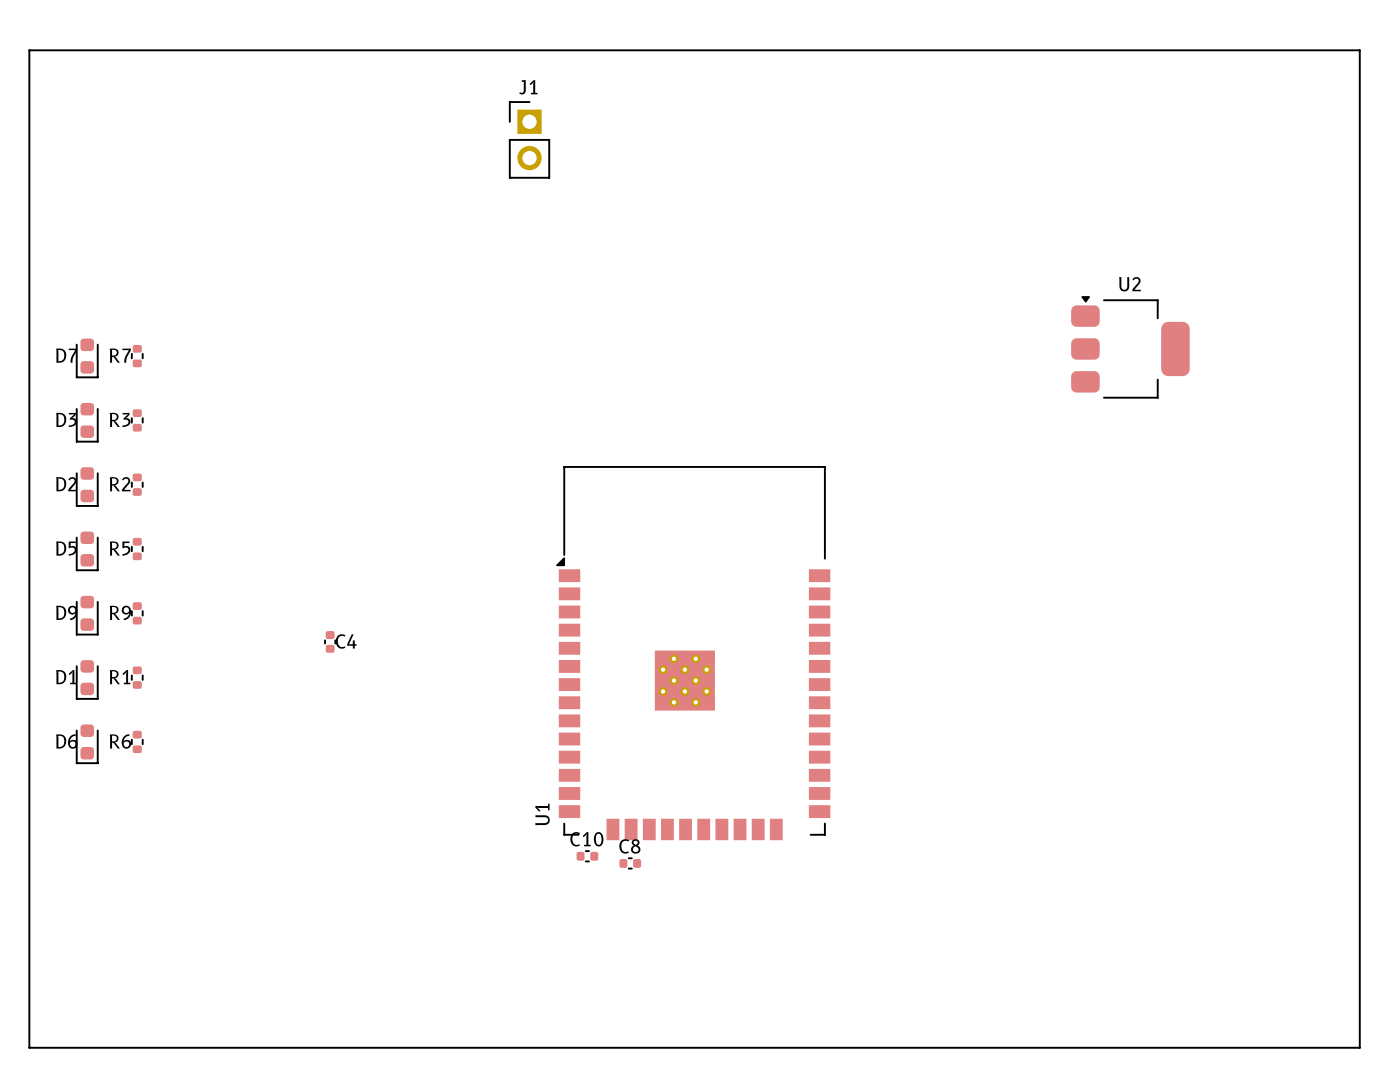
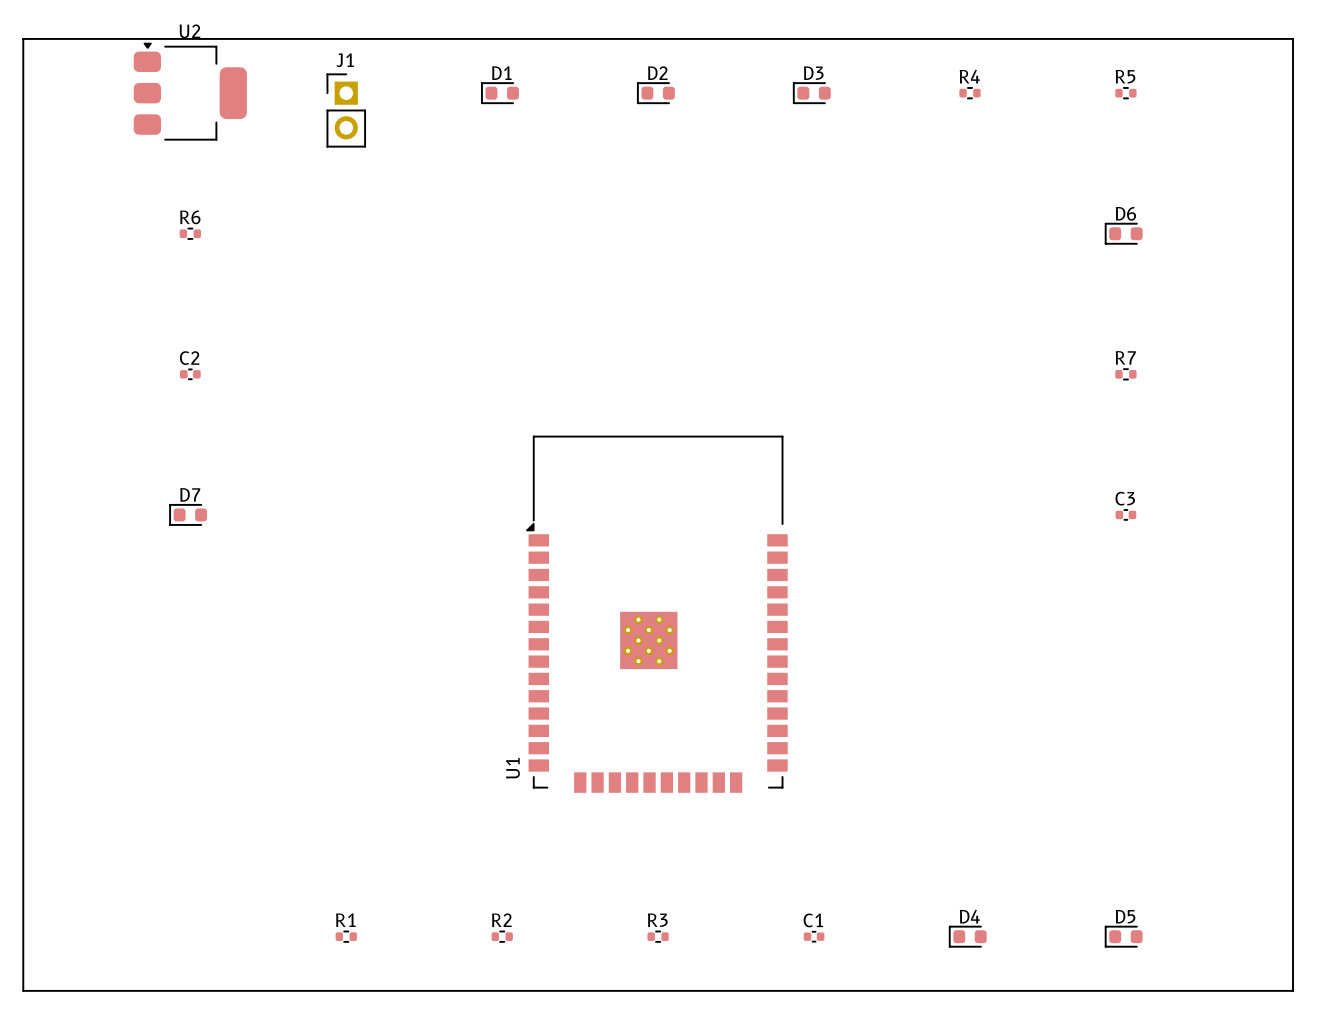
R4: none -> (969, 93)
J1 position: (529, 139) -> (346, 110)
U2 position: (1130, 347) -> (190, 91)
R7 rotation: 0° (137, 356) -> 90° clockwise (1125, 374)
R7 position: (137, 356) -> (1125, 374)
D7 rotation: 0° (87, 358) -> 90° clockwise (188, 514)
D7 position: (87, 358) -> (188, 514)
C2: none -> (190, 374)
R3 rotation: 0° (137, 420) -> 90° clockwise (658, 936)
R3 position: (137, 420) -> (658, 936)
D3 rotation: 0° (87, 422) -> 90° clockwise (811, 93)
D3 position: (87, 422) -> (811, 93)
R2 rotation: 0° (137, 484) -> 90° clockwise (502, 936)
R2 position: (137, 484) -> (502, 936)
D2 rotation: 0° (87, 487) -> 90° clockwise (655, 93)
D2 position: (87, 487) -> (655, 93)
R5 rotation: 0° (137, 549) -> 90° clockwise (1125, 93)
R5 position: (137, 549) -> (1125, 93)
C3: none -> (1125, 514)
D5 rotation: 0° (87, 551) -> 90° clockwise (1123, 936)
D5 position: (87, 551) -> (1123, 936)
R9: (137, 613) -> none
D9: (87, 615) -> none
C4: (330, 641) -> none
R1 rotation: 0° (137, 677) -> 90° clockwise (346, 936)
R1 position: (137, 677) -> (346, 936)
D1 rotation: 0° (87, 679) -> 90° clockwise (500, 93)
D1 position: (87, 679) -> (500, 93)
R6 rotation: 0° (137, 741) -> 90° clockwise (190, 233)
R6 position: (137, 741) -> (190, 233)
D6 rotation: 0° (87, 744) -> 90° clockwise (1123, 233)
D6 position: (87, 744) -> (1123, 233)
C10: (587, 856) -> none
C8: (630, 863) -> none
C1: none -> (814, 936)
D4: none -> (967, 936)

